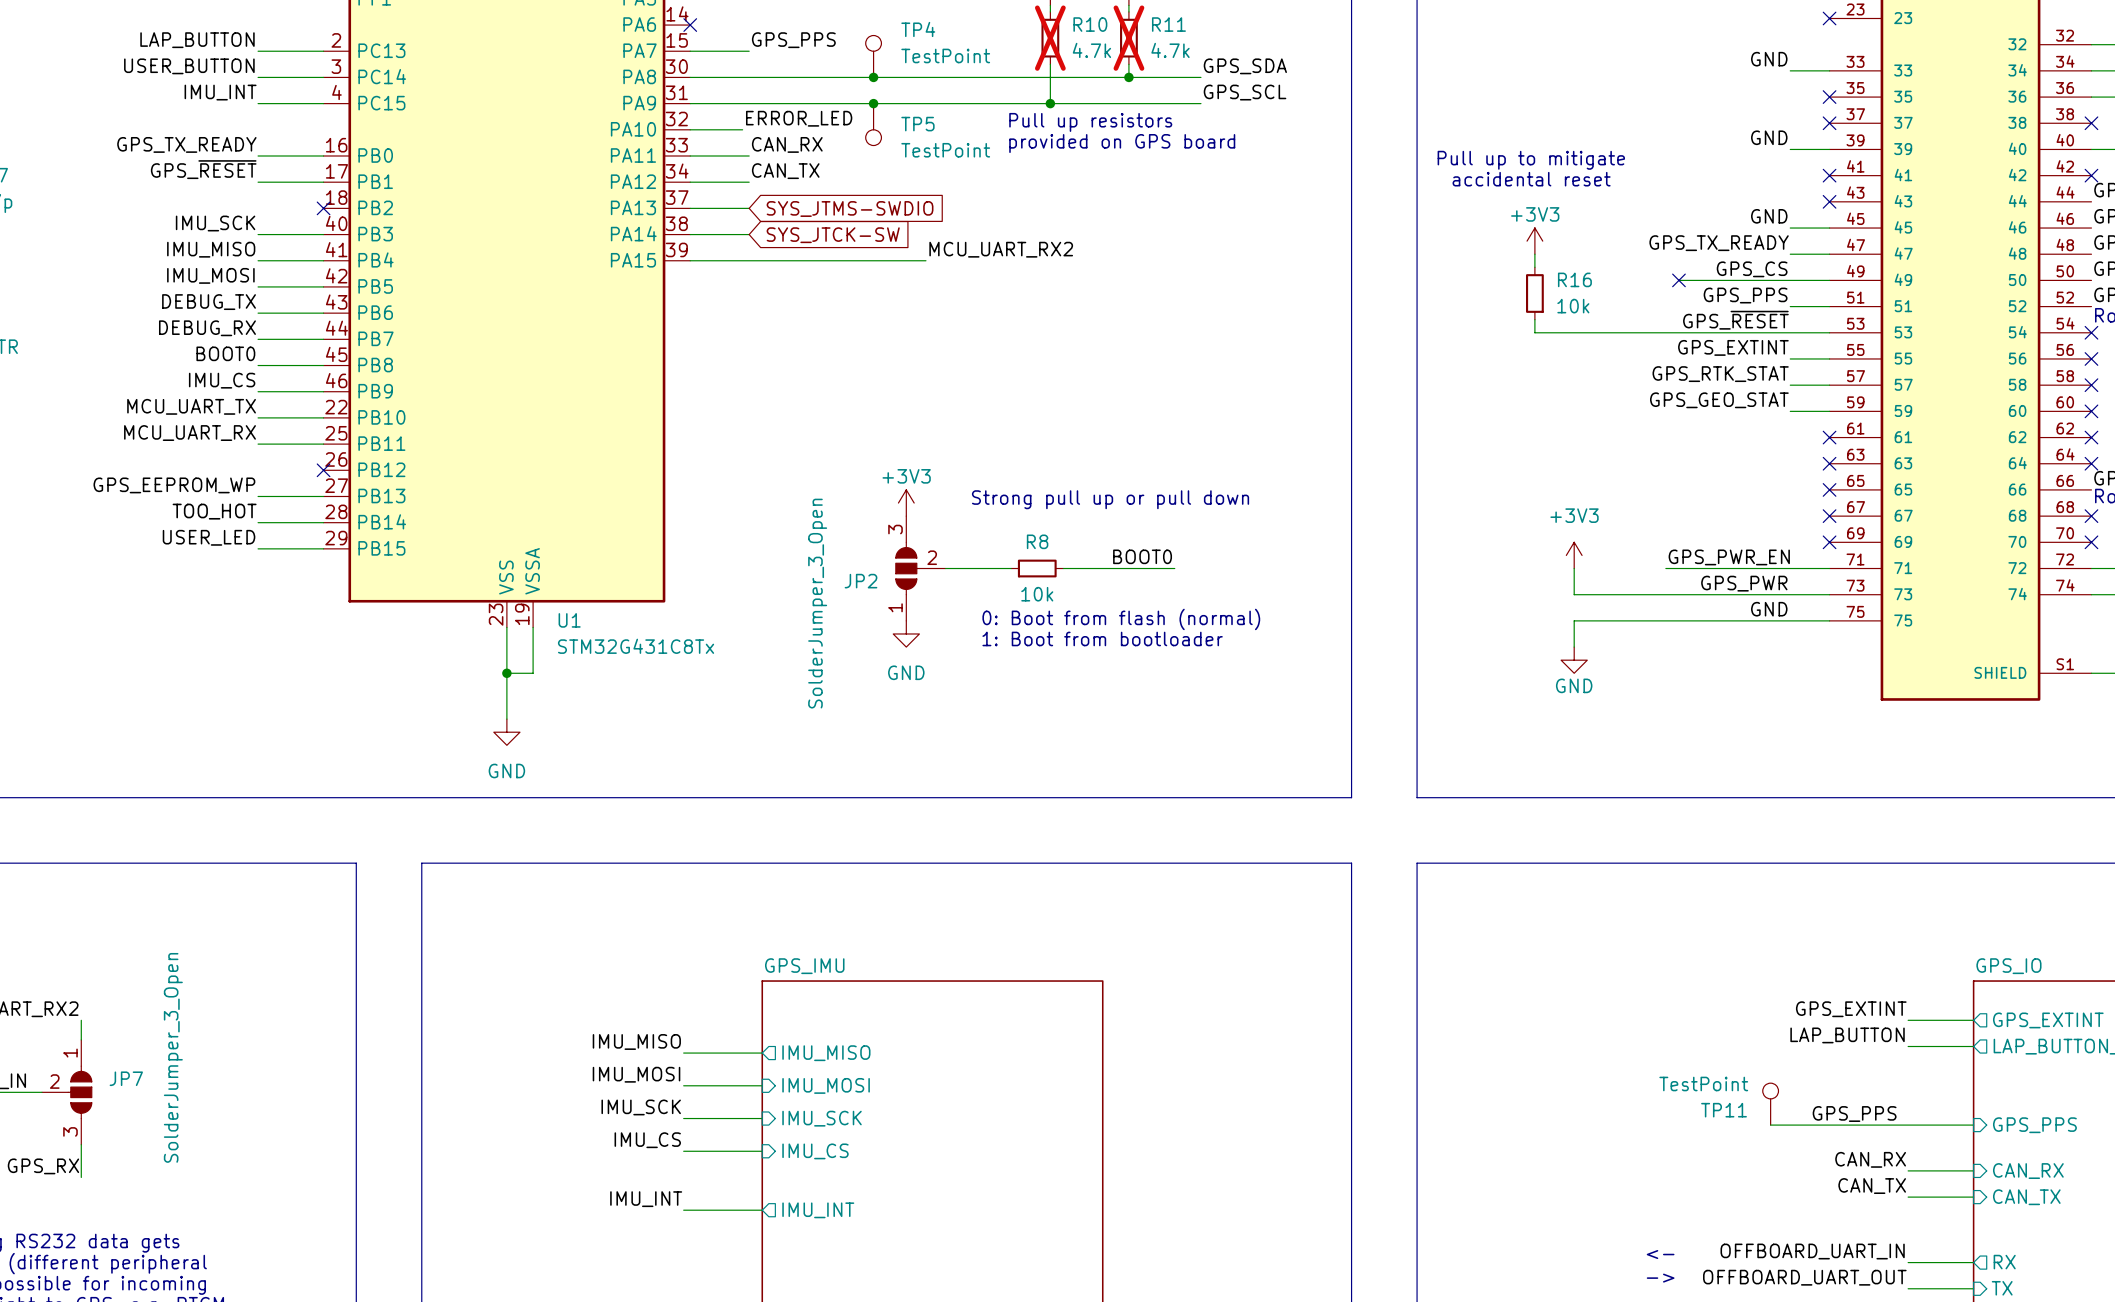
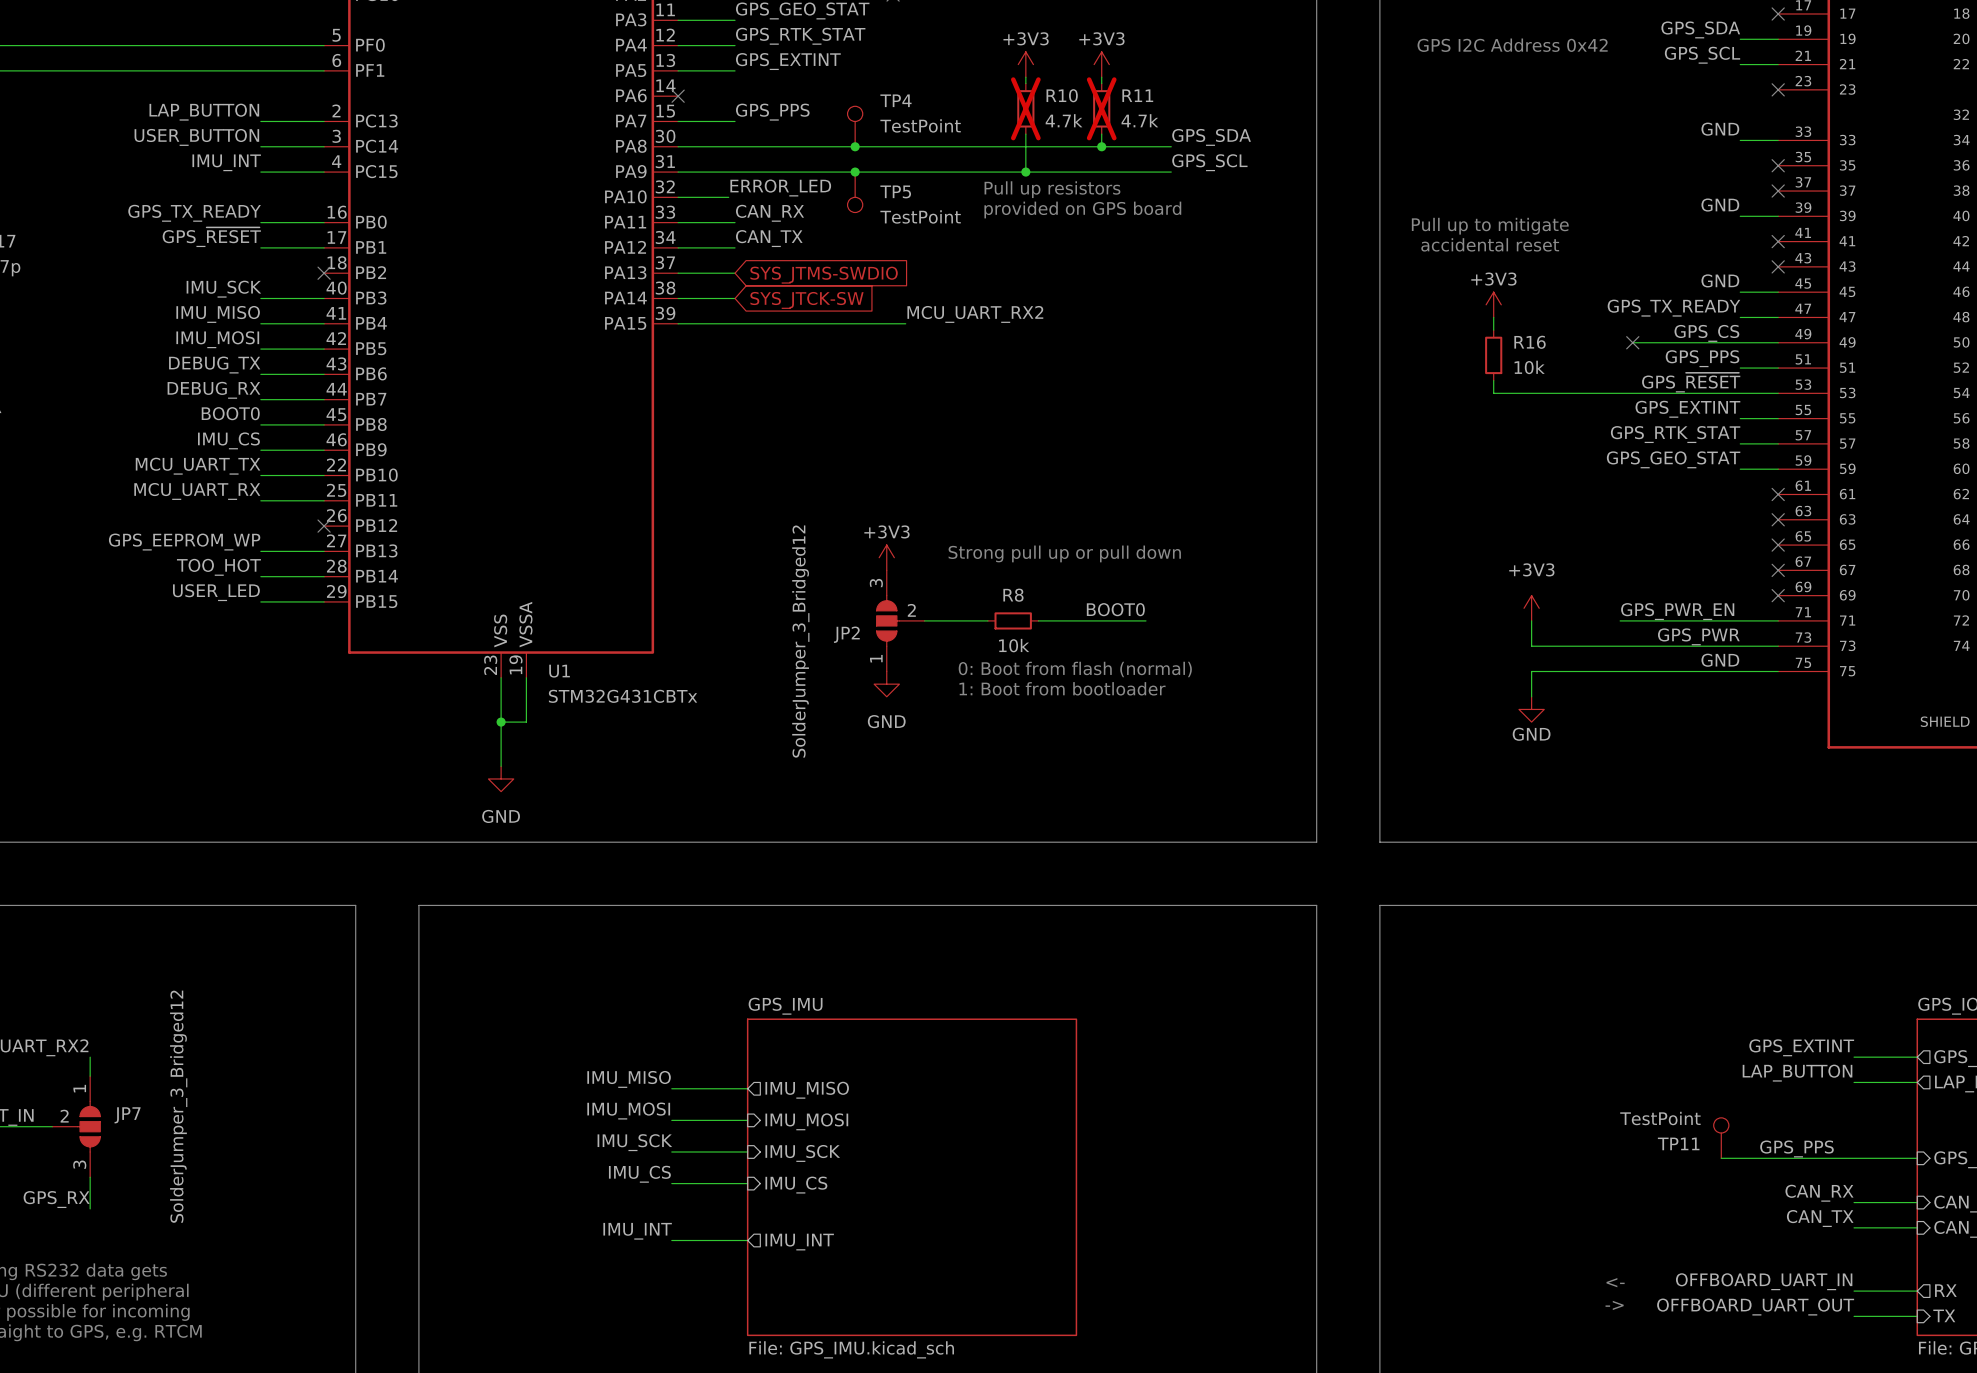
JP2 value: SolderJumper_3_Open (817, 603) -> SolderJumper_3_Bridged12 (800, 641)
U1 value: STM32G431C8Tx (636, 646) -> STM32G431CBTx (623, 696)
JP7 value: SolderJumper_3_Open (173, 1057) -> SolderJumper_3_Bridged12 (178, 1106)

